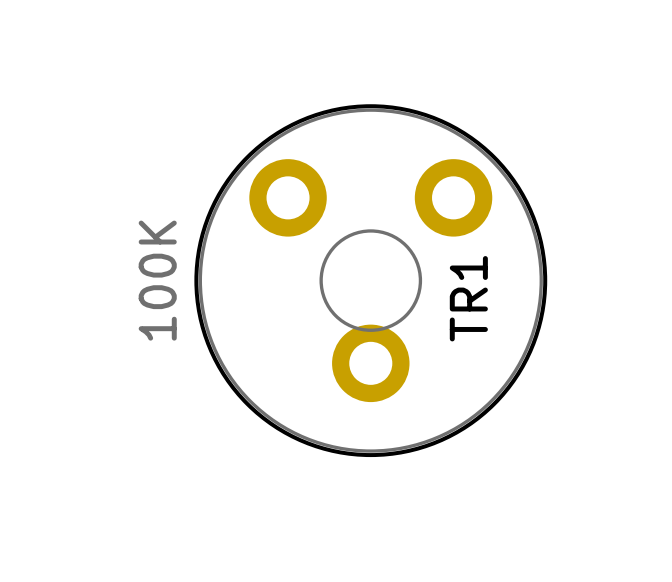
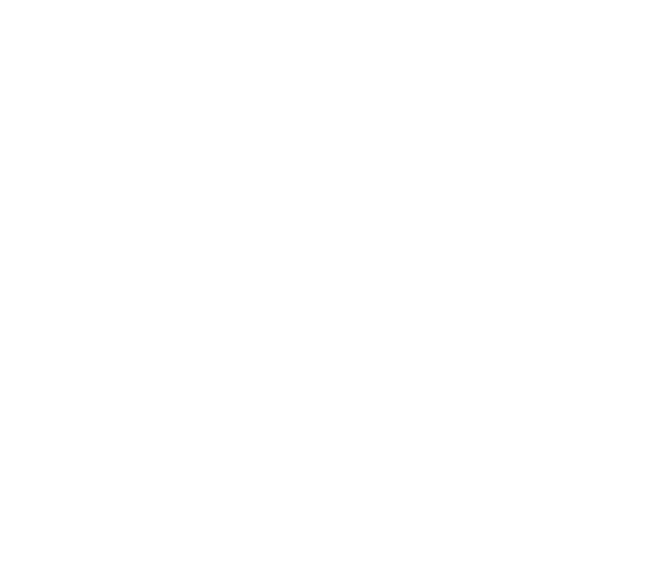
TR1: 100K (370, 280) -> none

